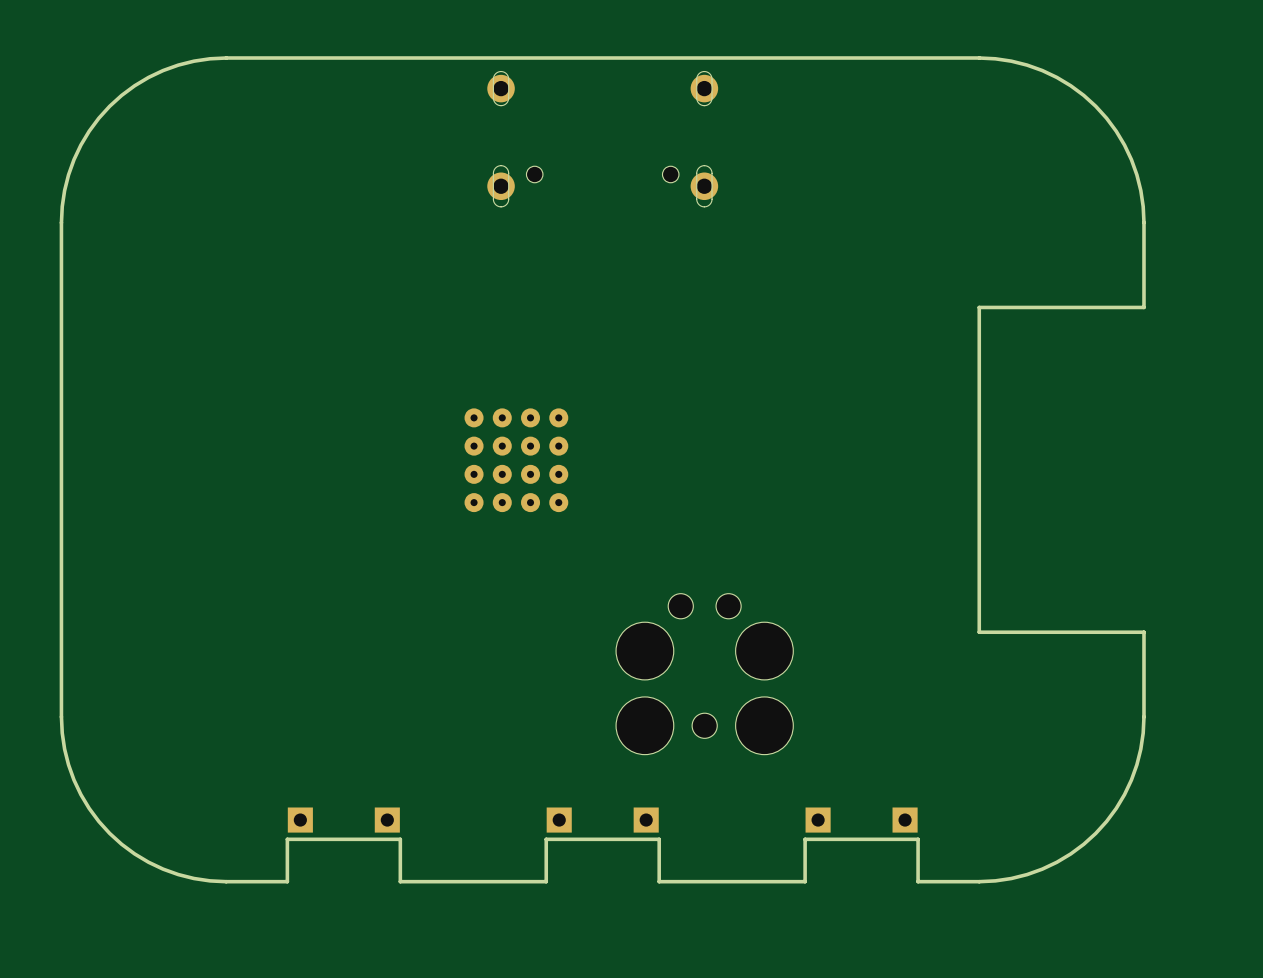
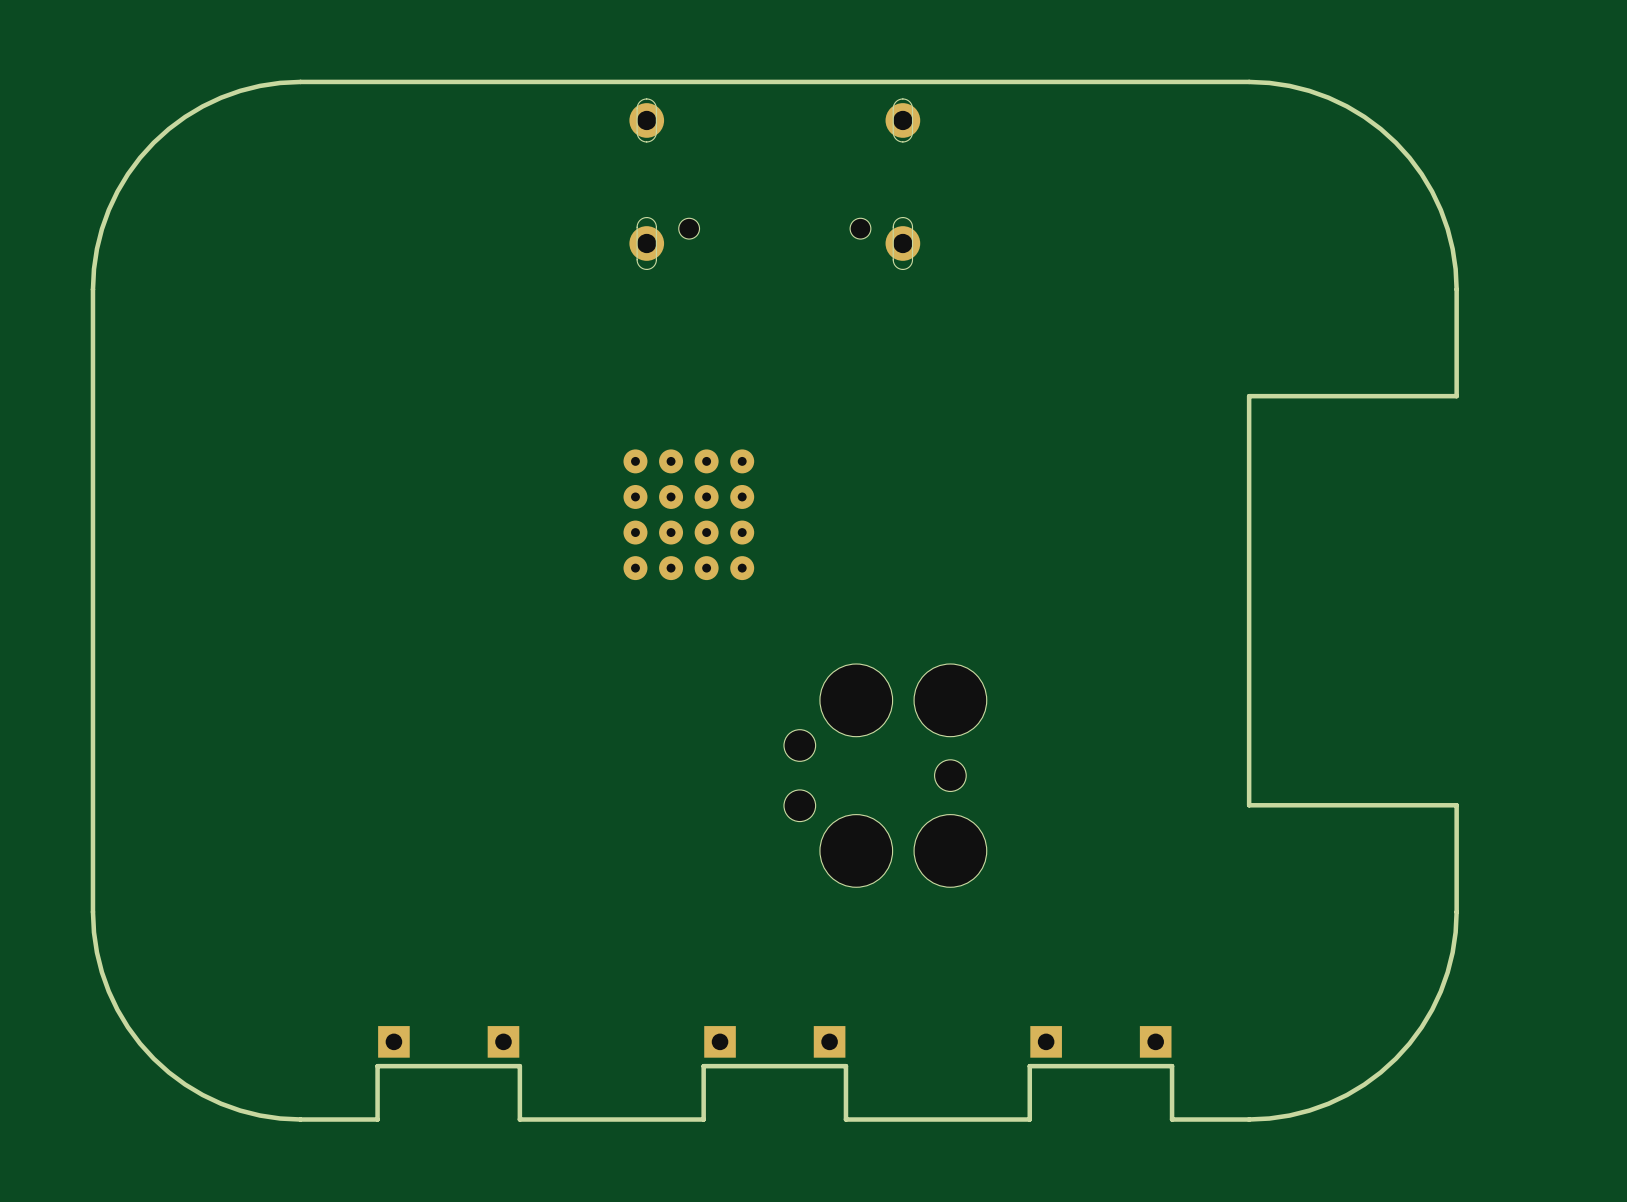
part position: (516, 460) -> (688, 514)
part rotation: 0° (704, 674) -> 90° counterclockwise (885, 775)

